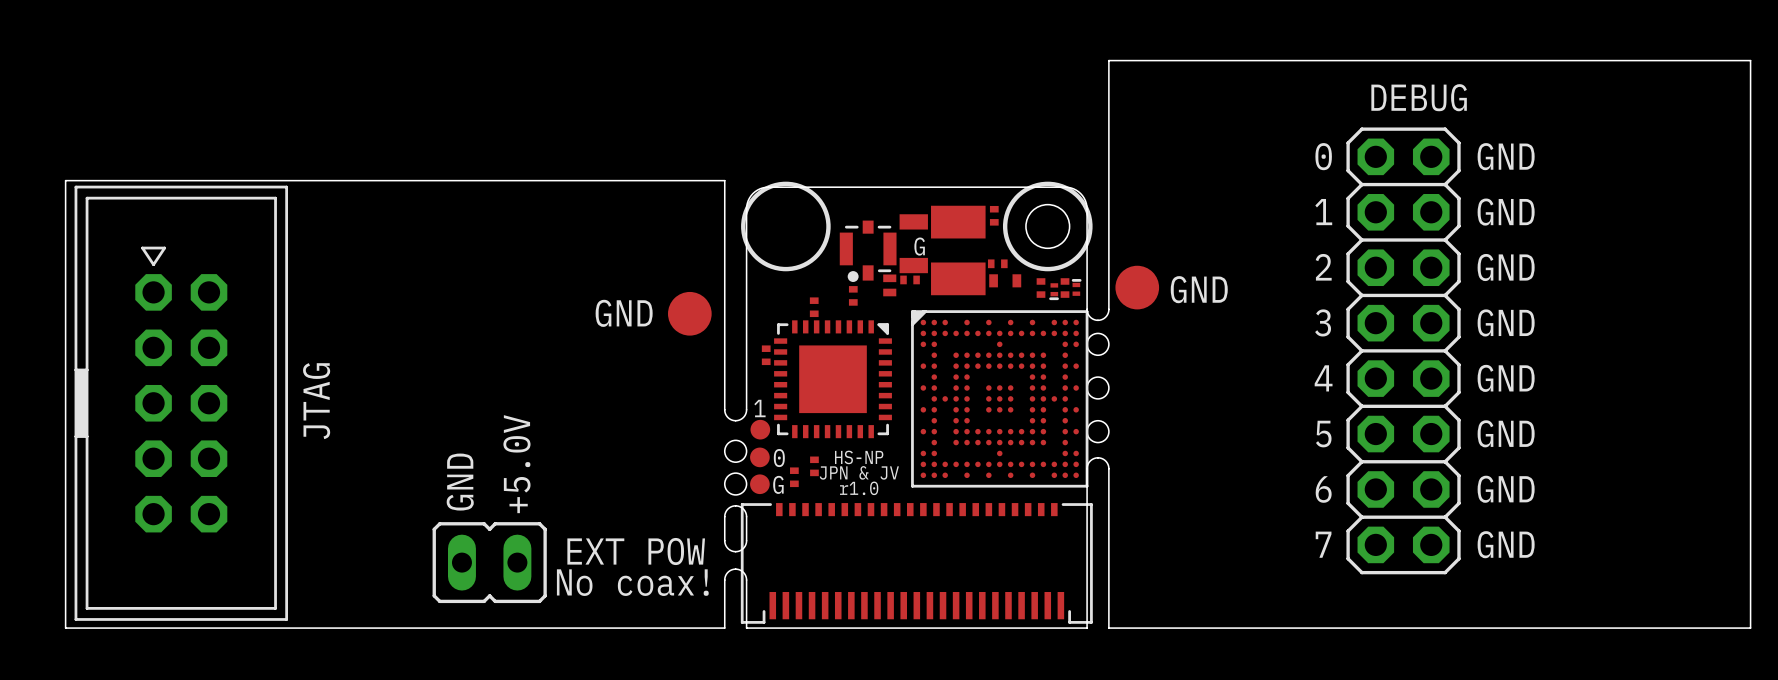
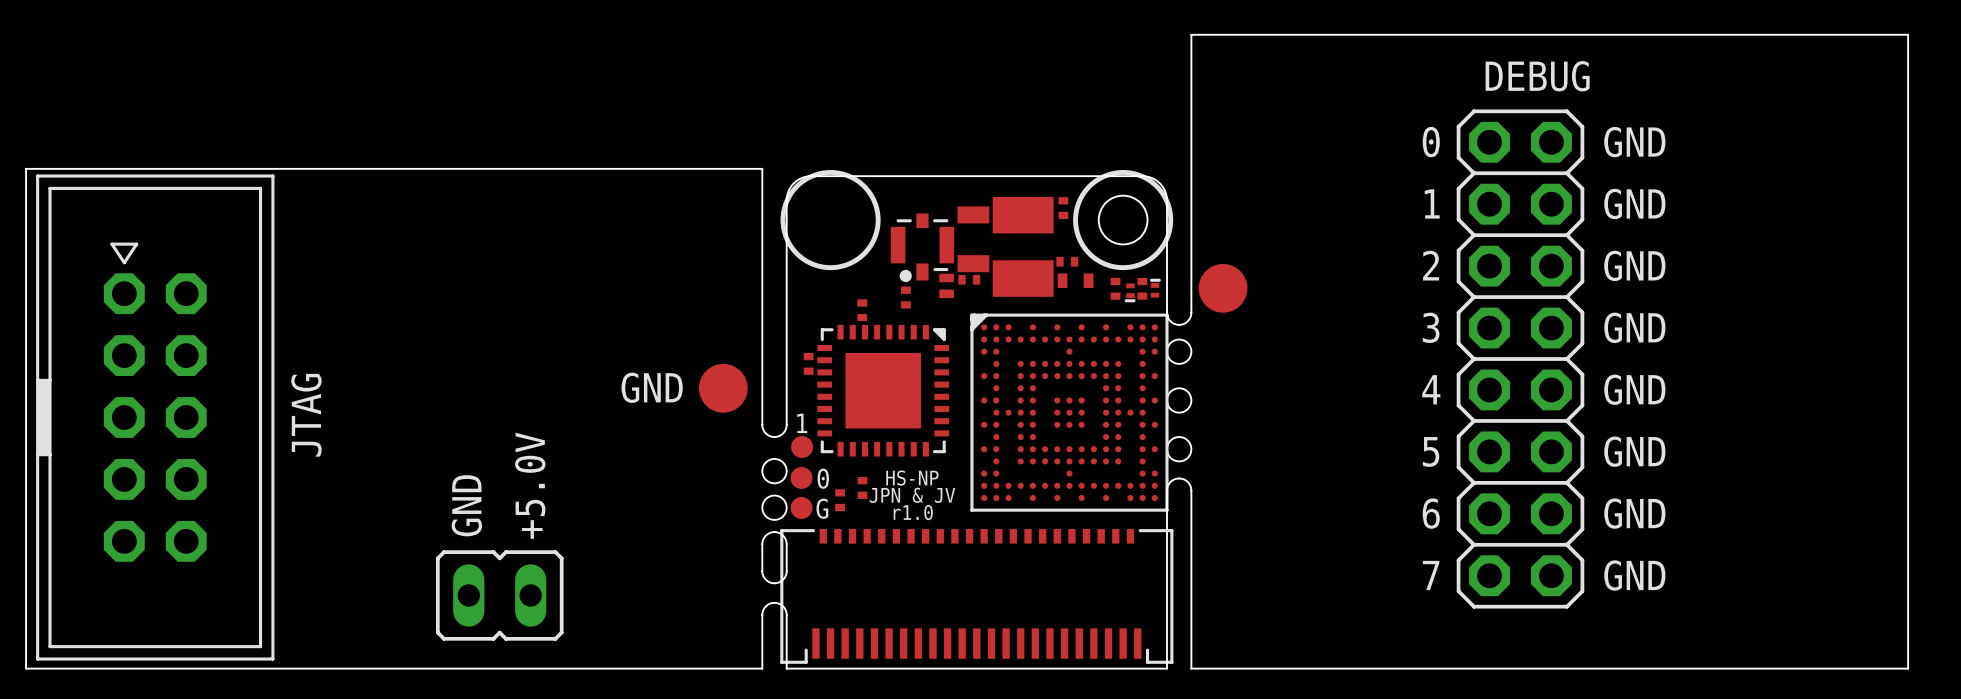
text: G (919, 246) -> none
text: GND (1199, 289) -> none
text position: GND (624, 313) -> GND (652, 387)
part position: (689, 313) -> (723, 388)
text: EXT POW (636, 551) -> none
text: No coax! (632, 582) -> none

